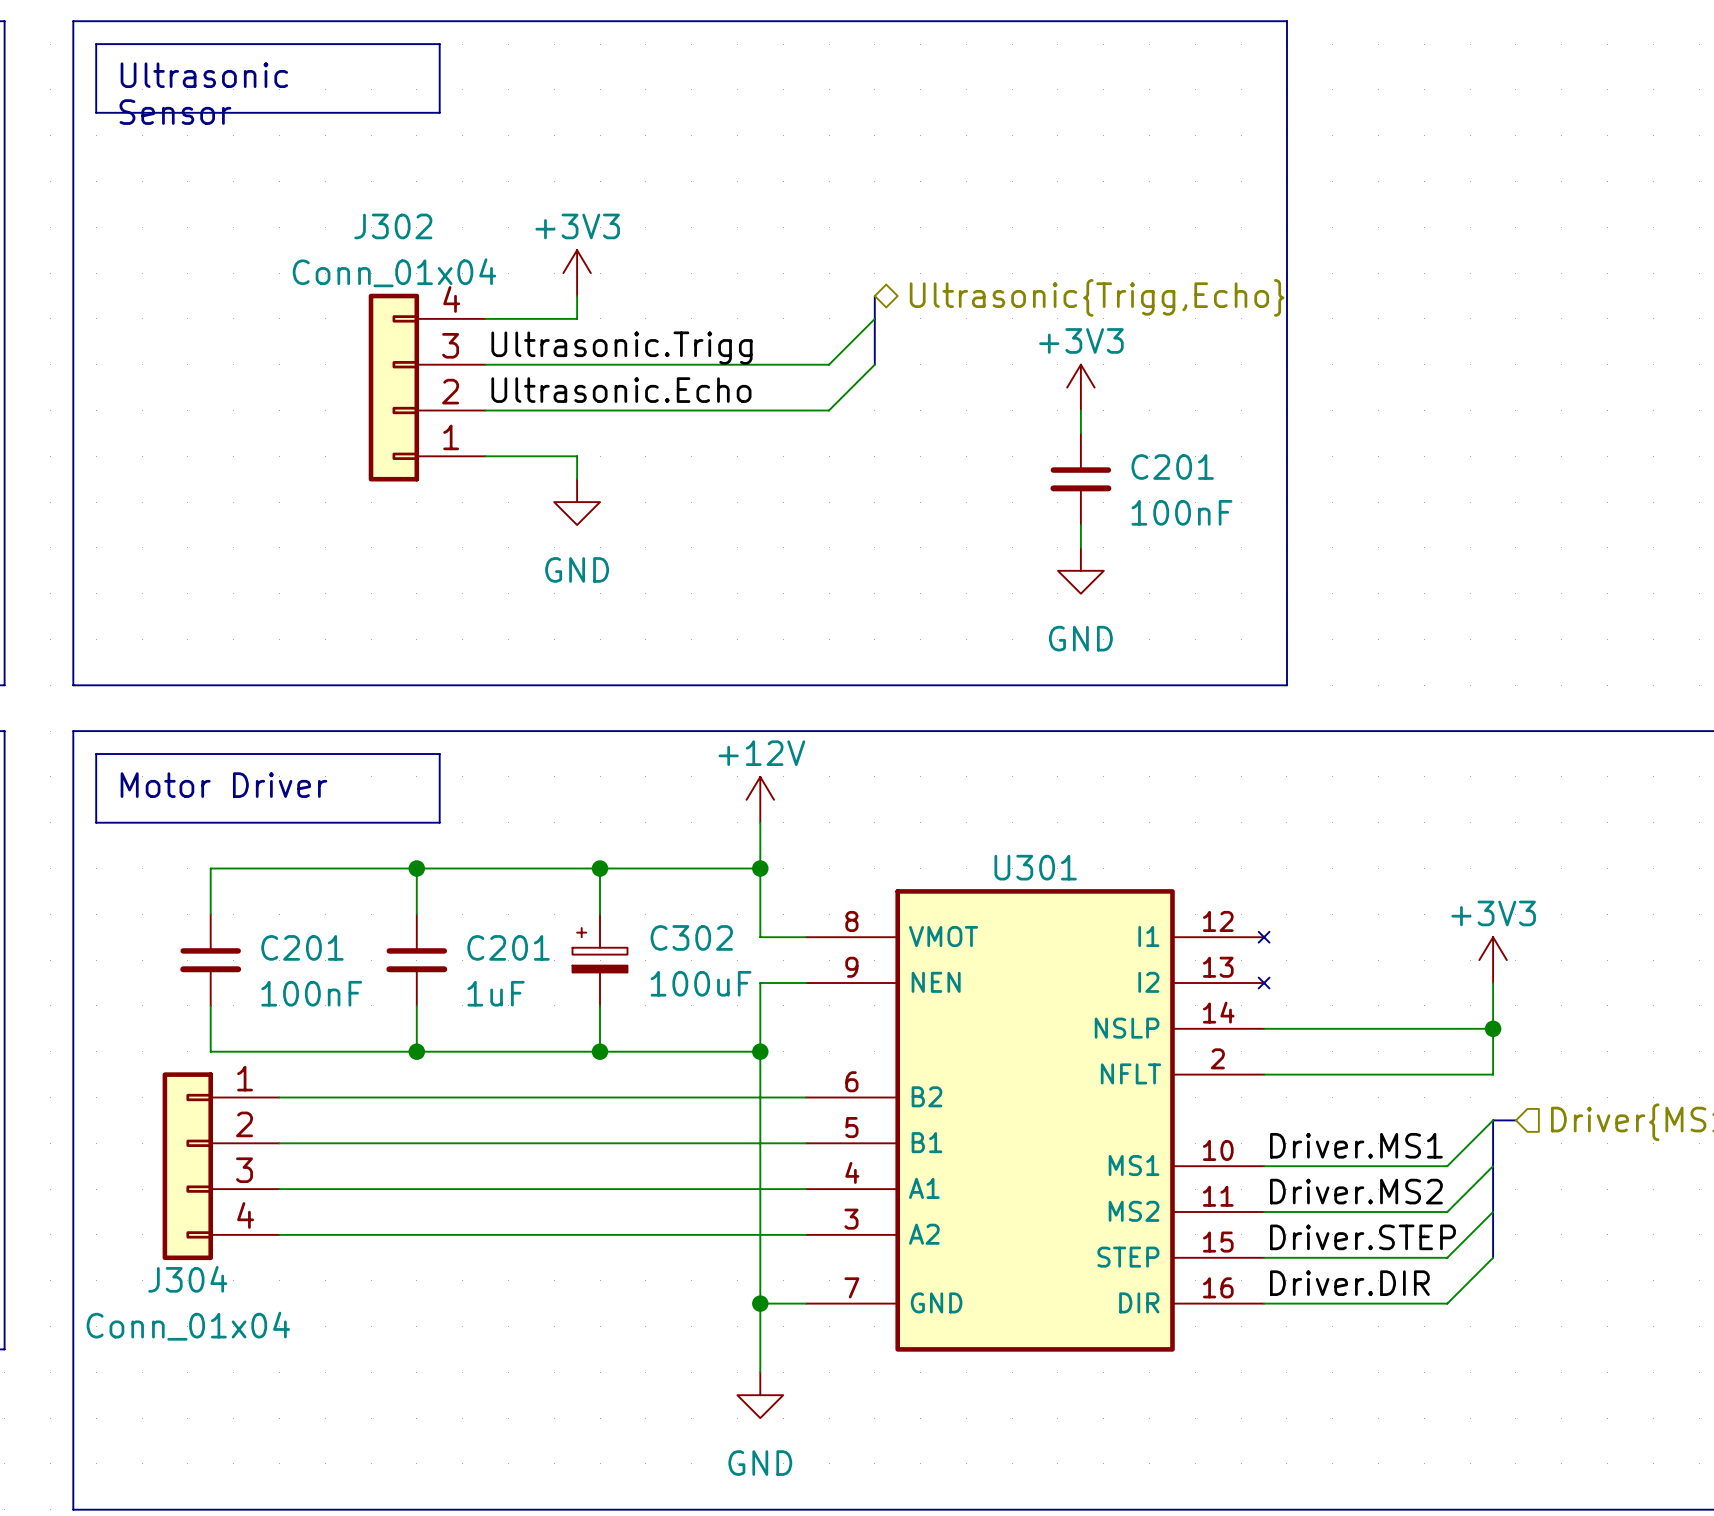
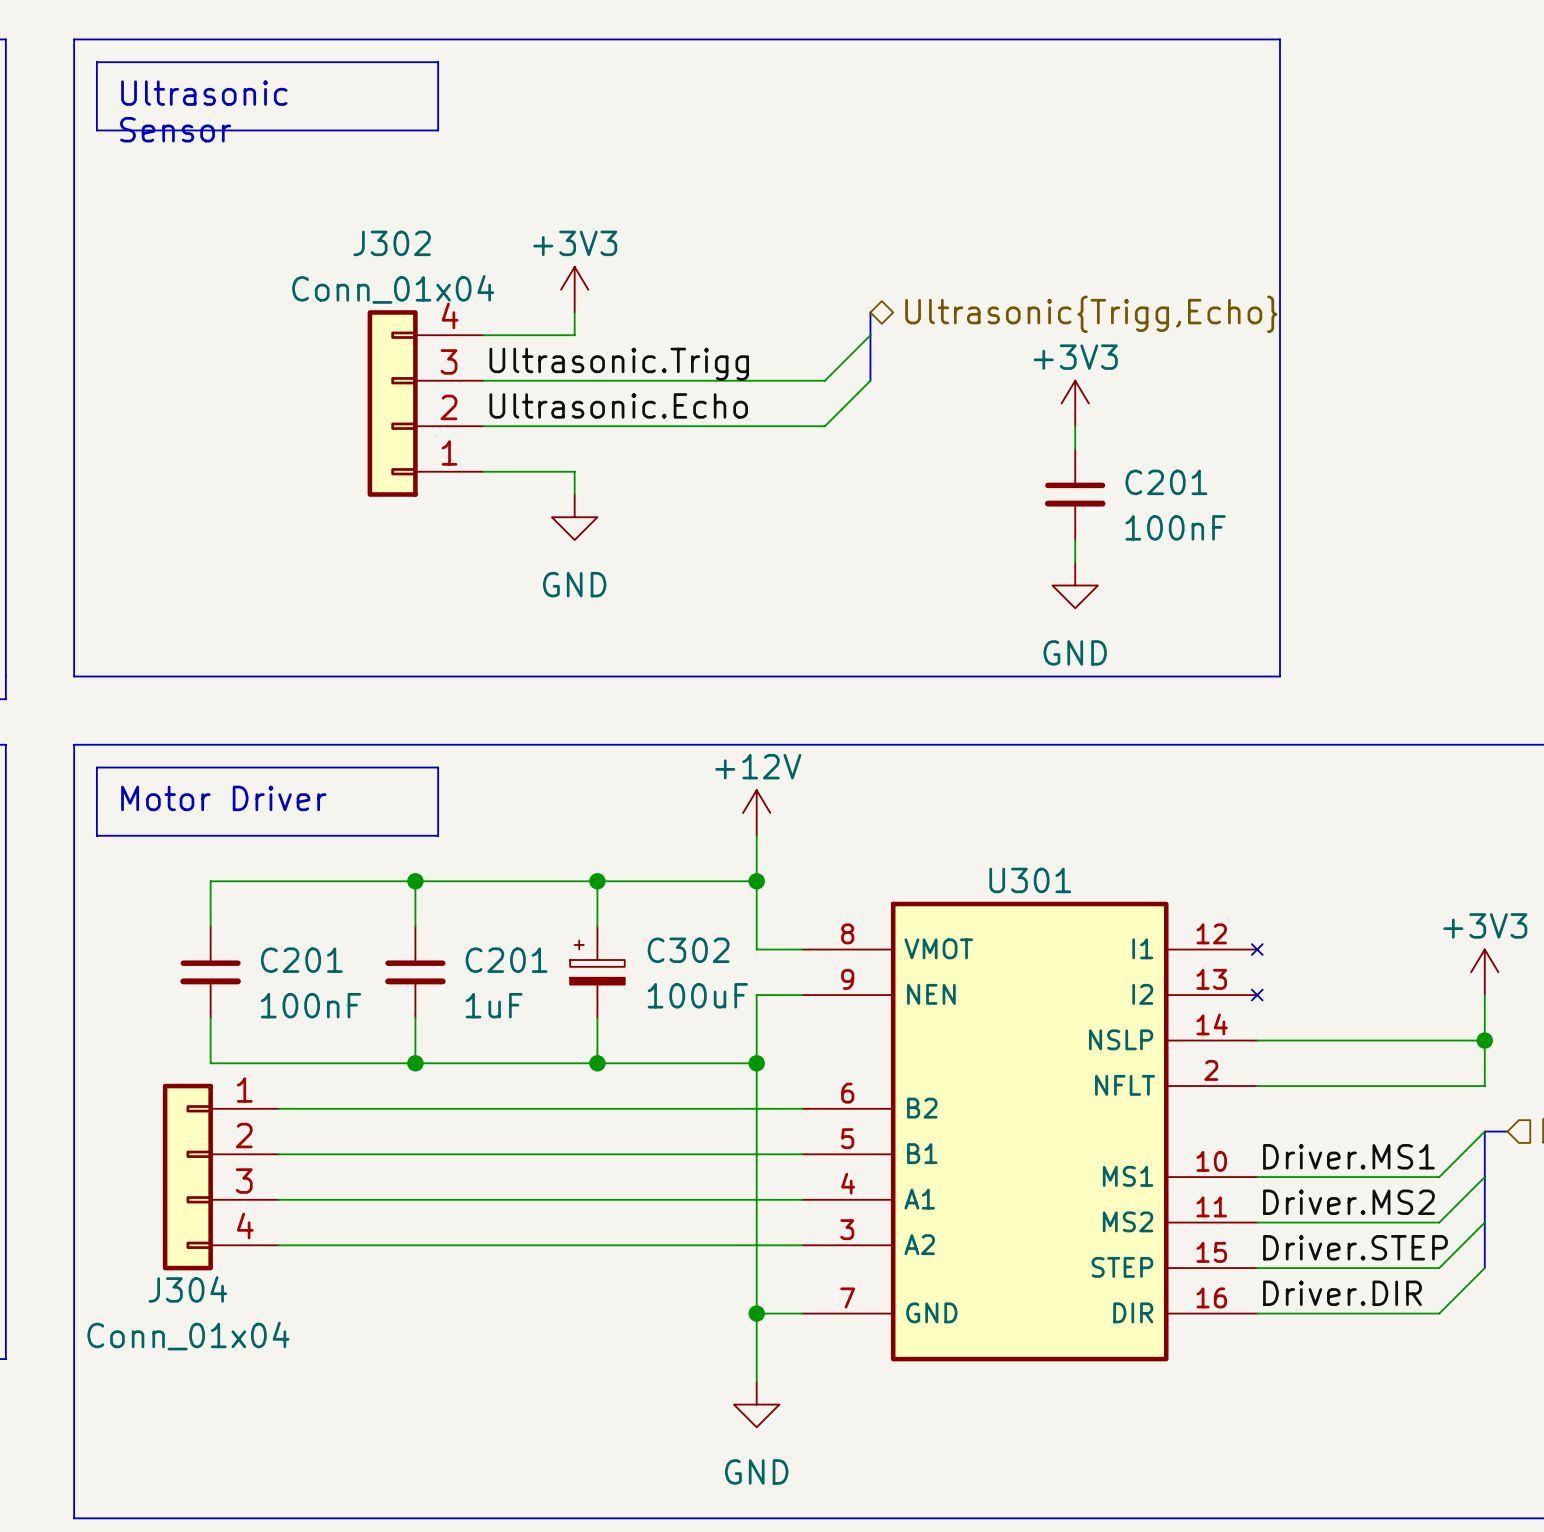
line: (73, 662) (73, 685) (1286, 685) (1286, 662) -> (74, 676) (1280, 676)

